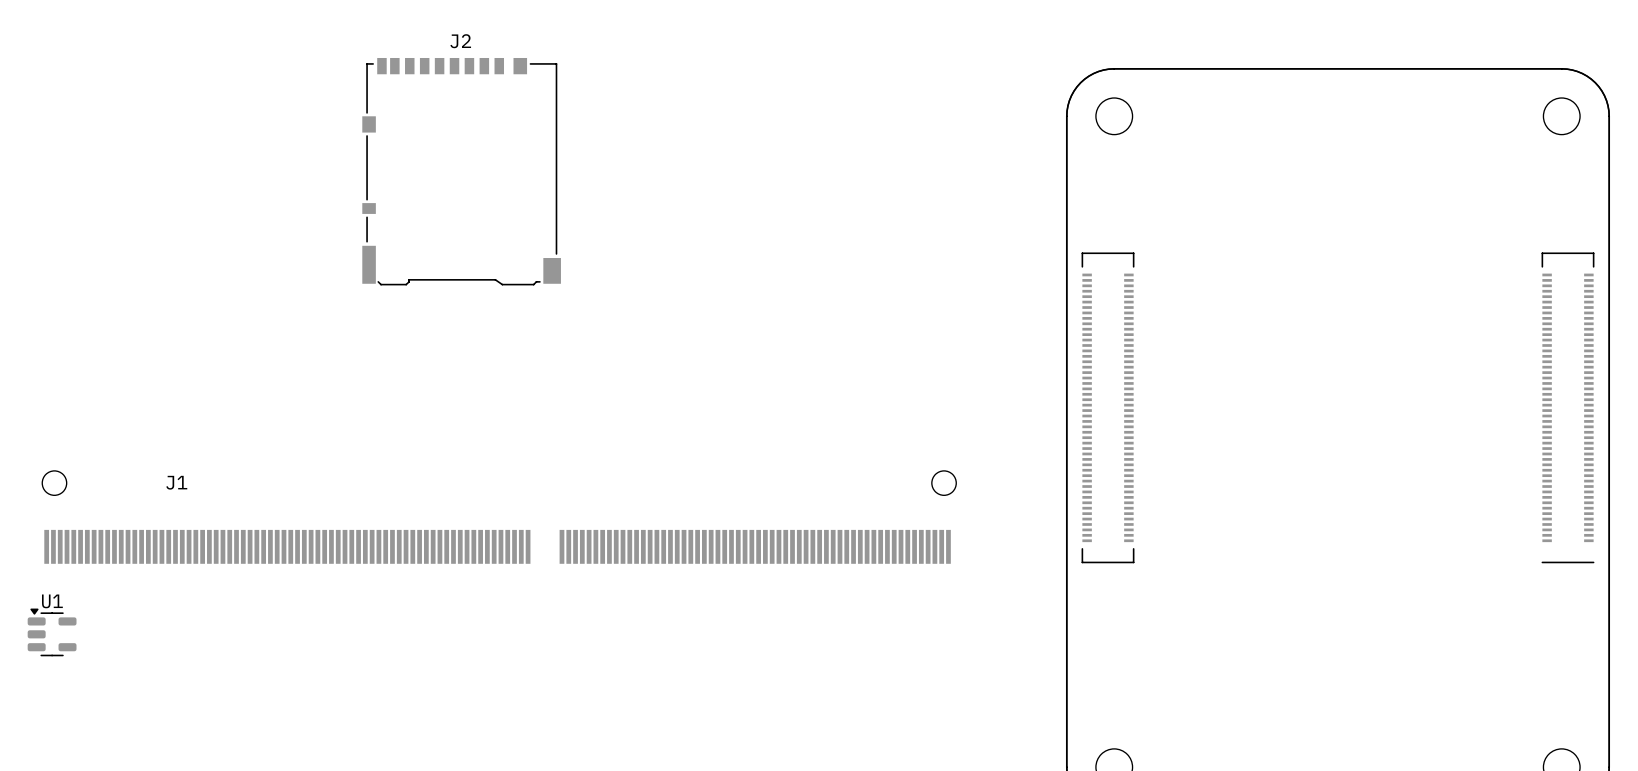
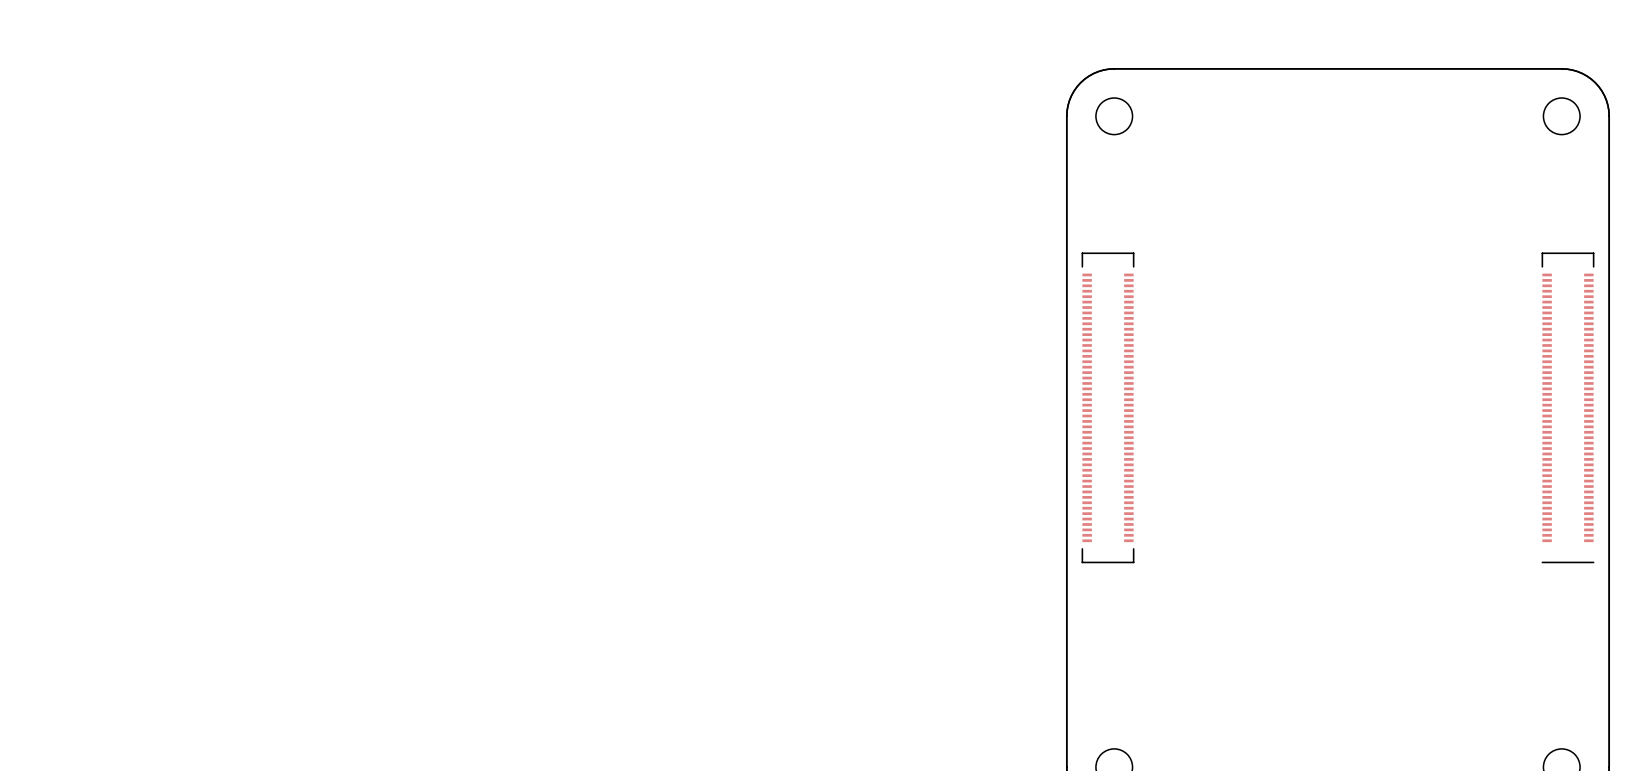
J2: (461, 171) -> none
J1: (499, 517) -> none
U1: (52, 632) -> none

